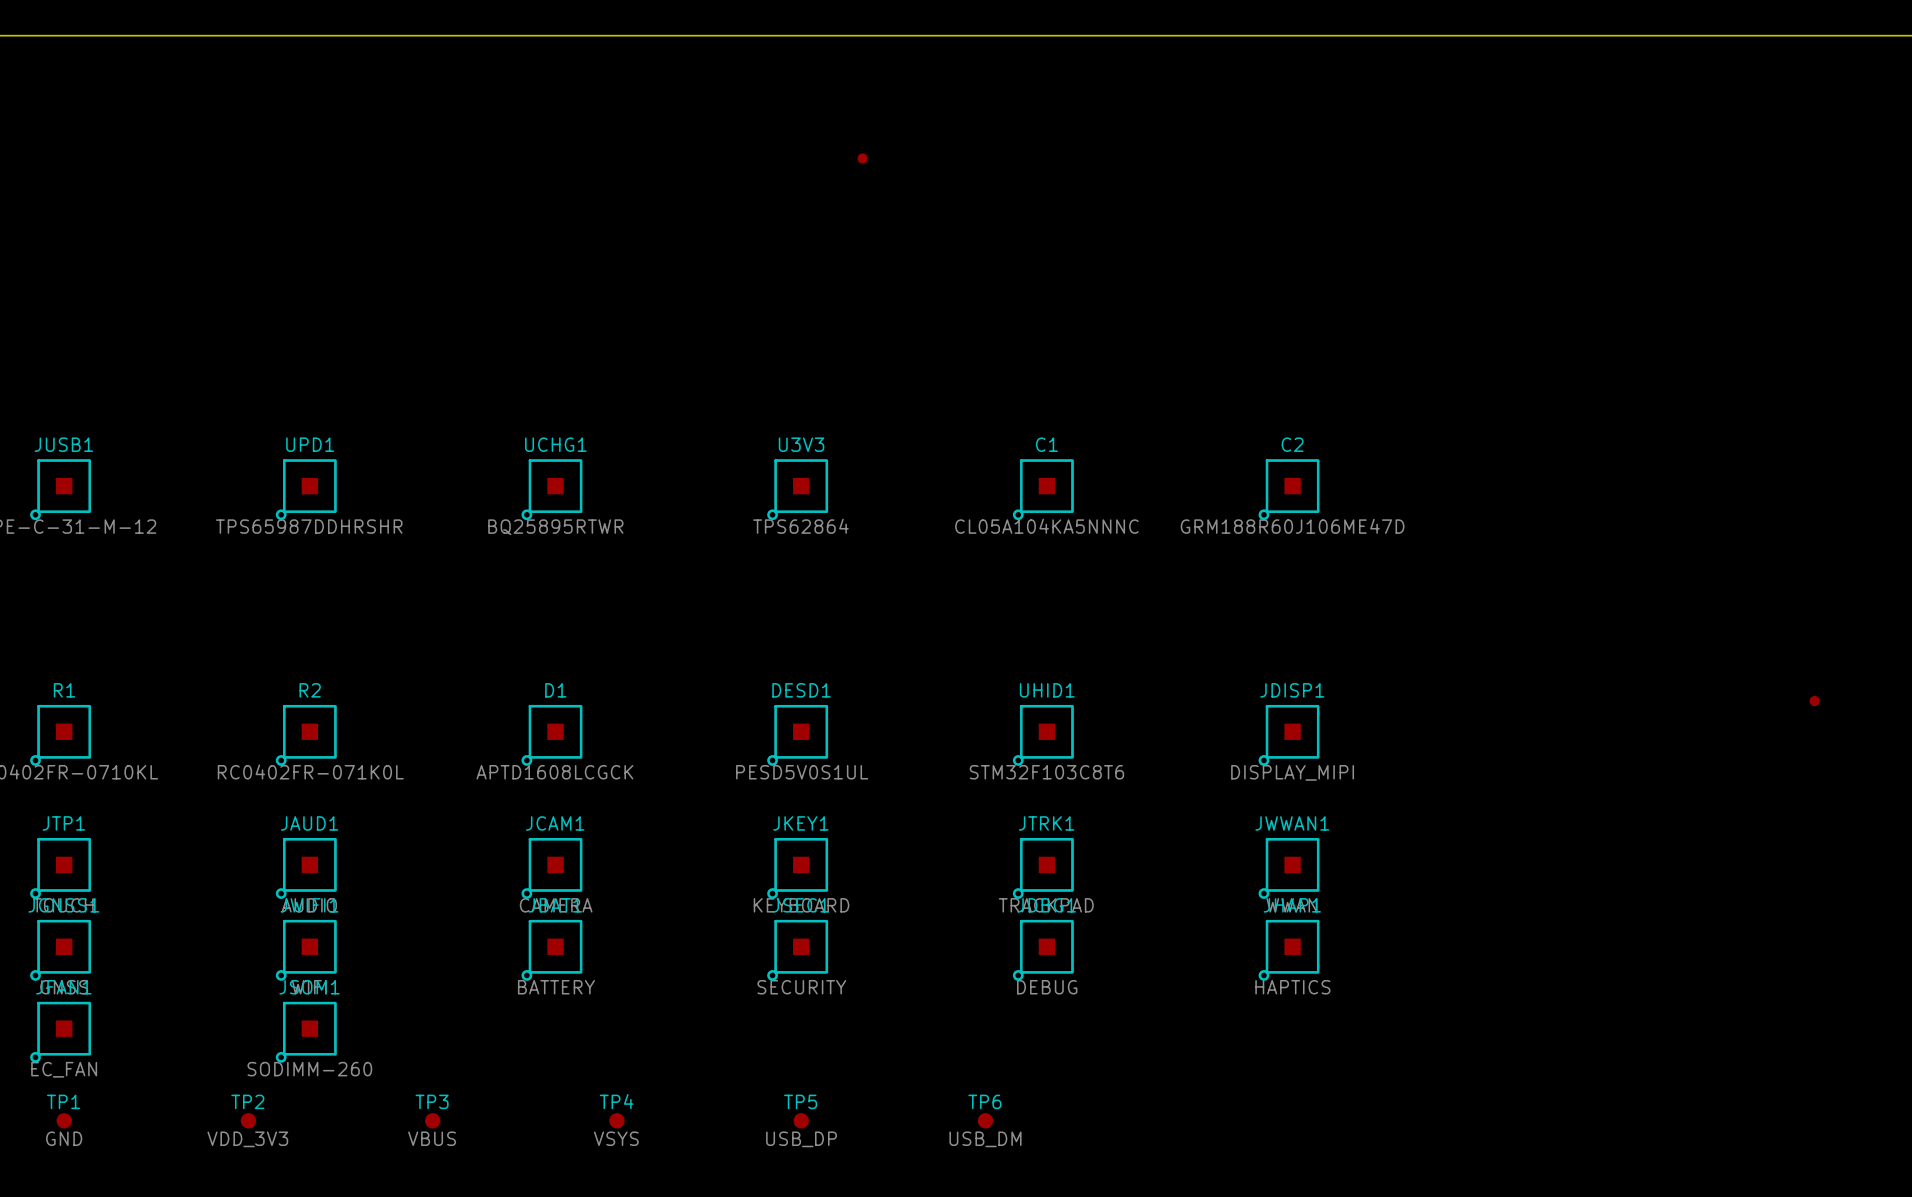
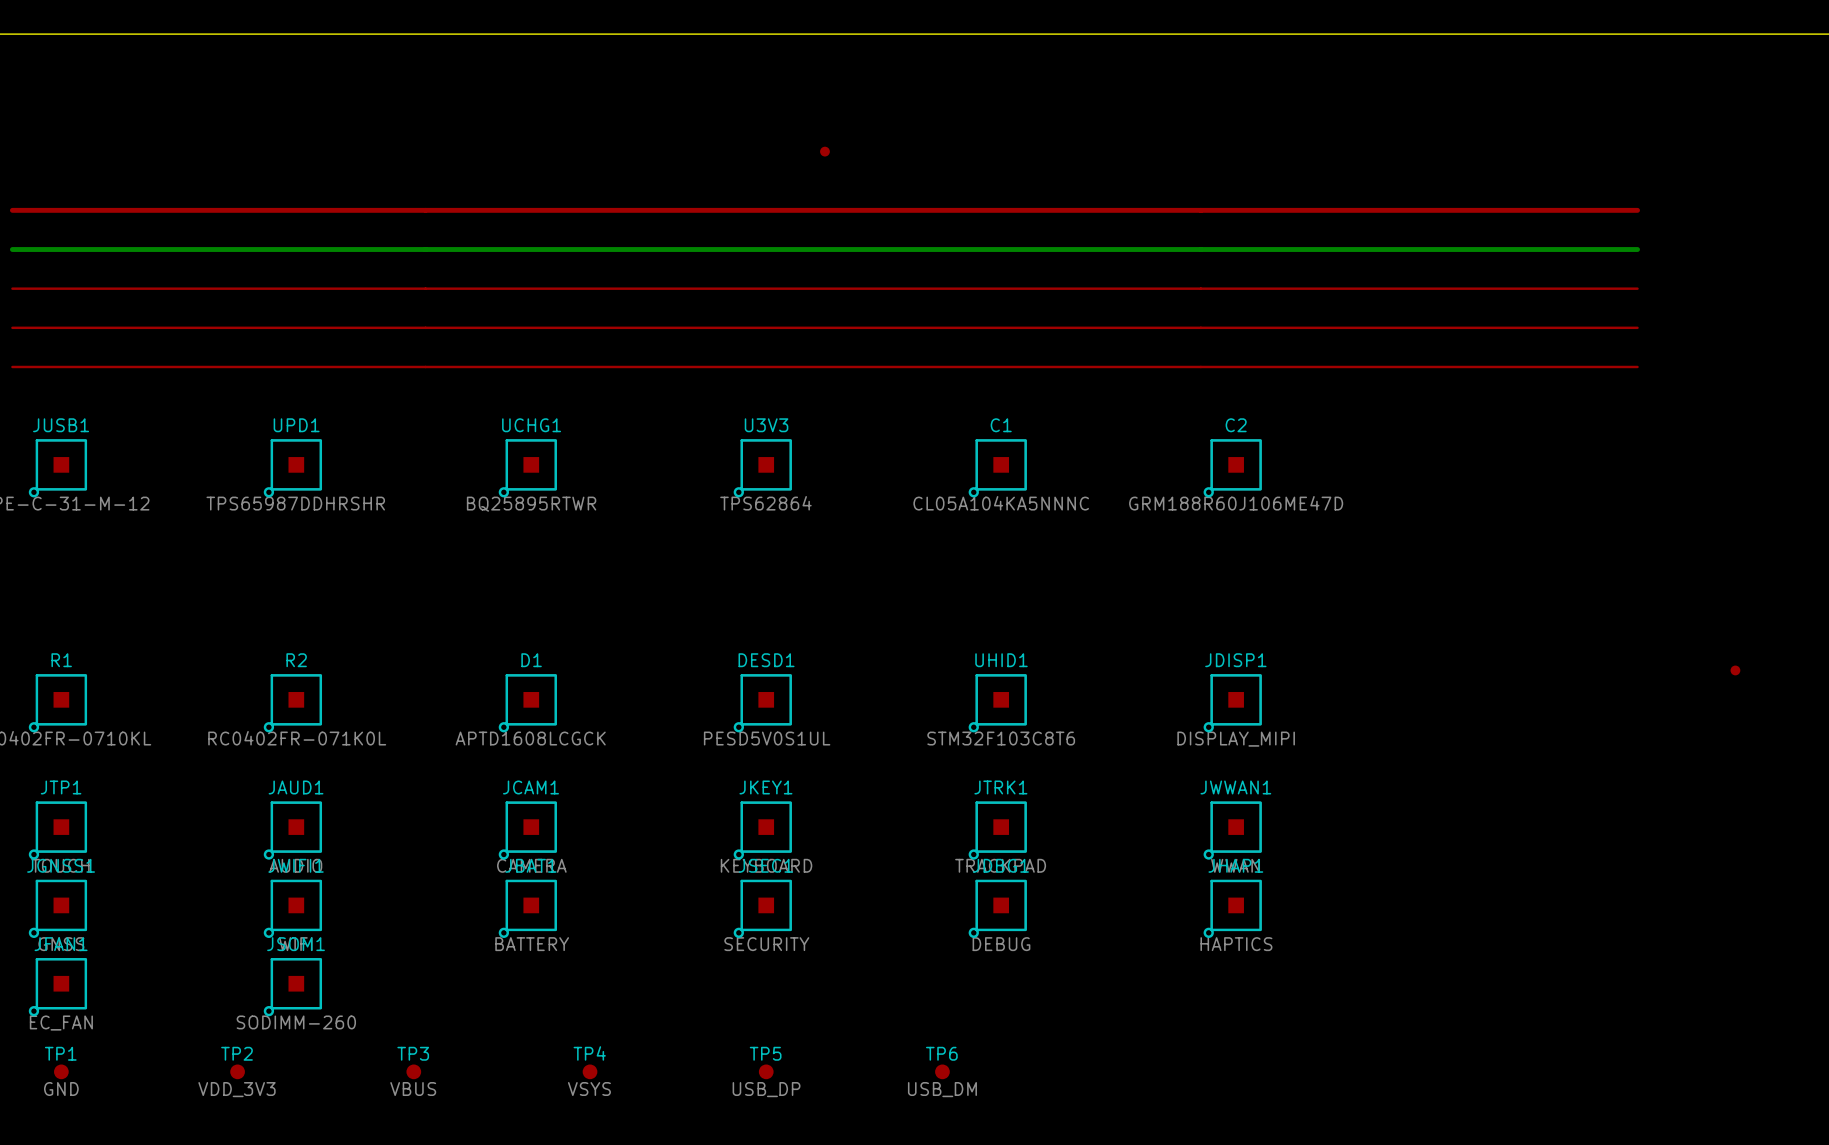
top track: none -> (12, 210) (1637, 210)
bottom track: none -> (12, 249) (1637, 249)
top track: none -> (12, 288) (1637, 288)
top track: none -> (12, 327) (1637, 327)
top track: none -> (12, 366) (1637, 366)

